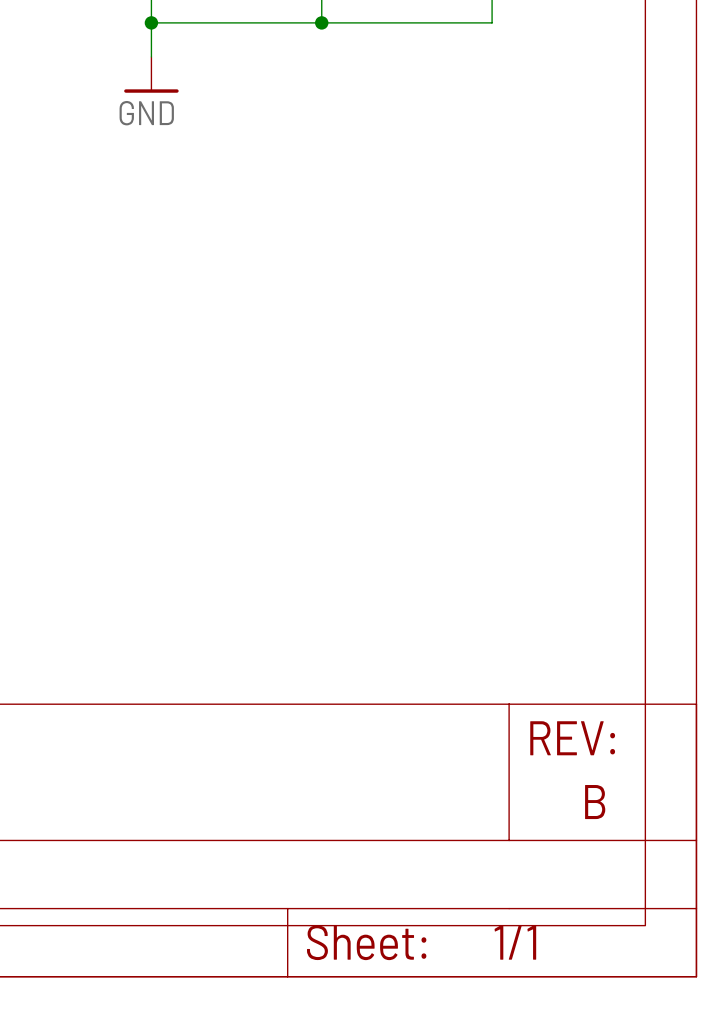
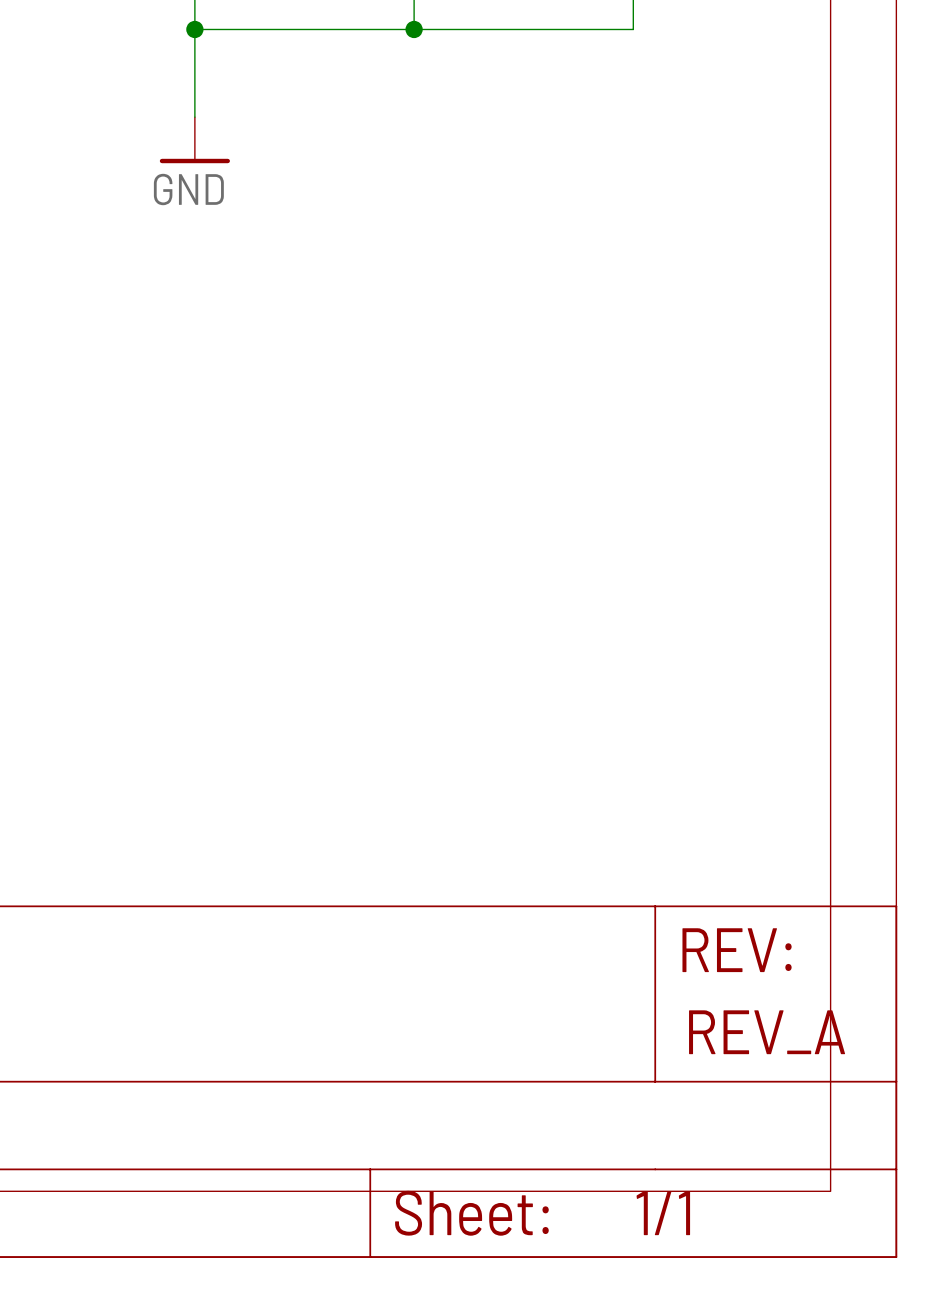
power symbol position: GND (151, 74) -> GND (194, 140)
part text: B (595, 802) -> REV_A (767, 1032)

